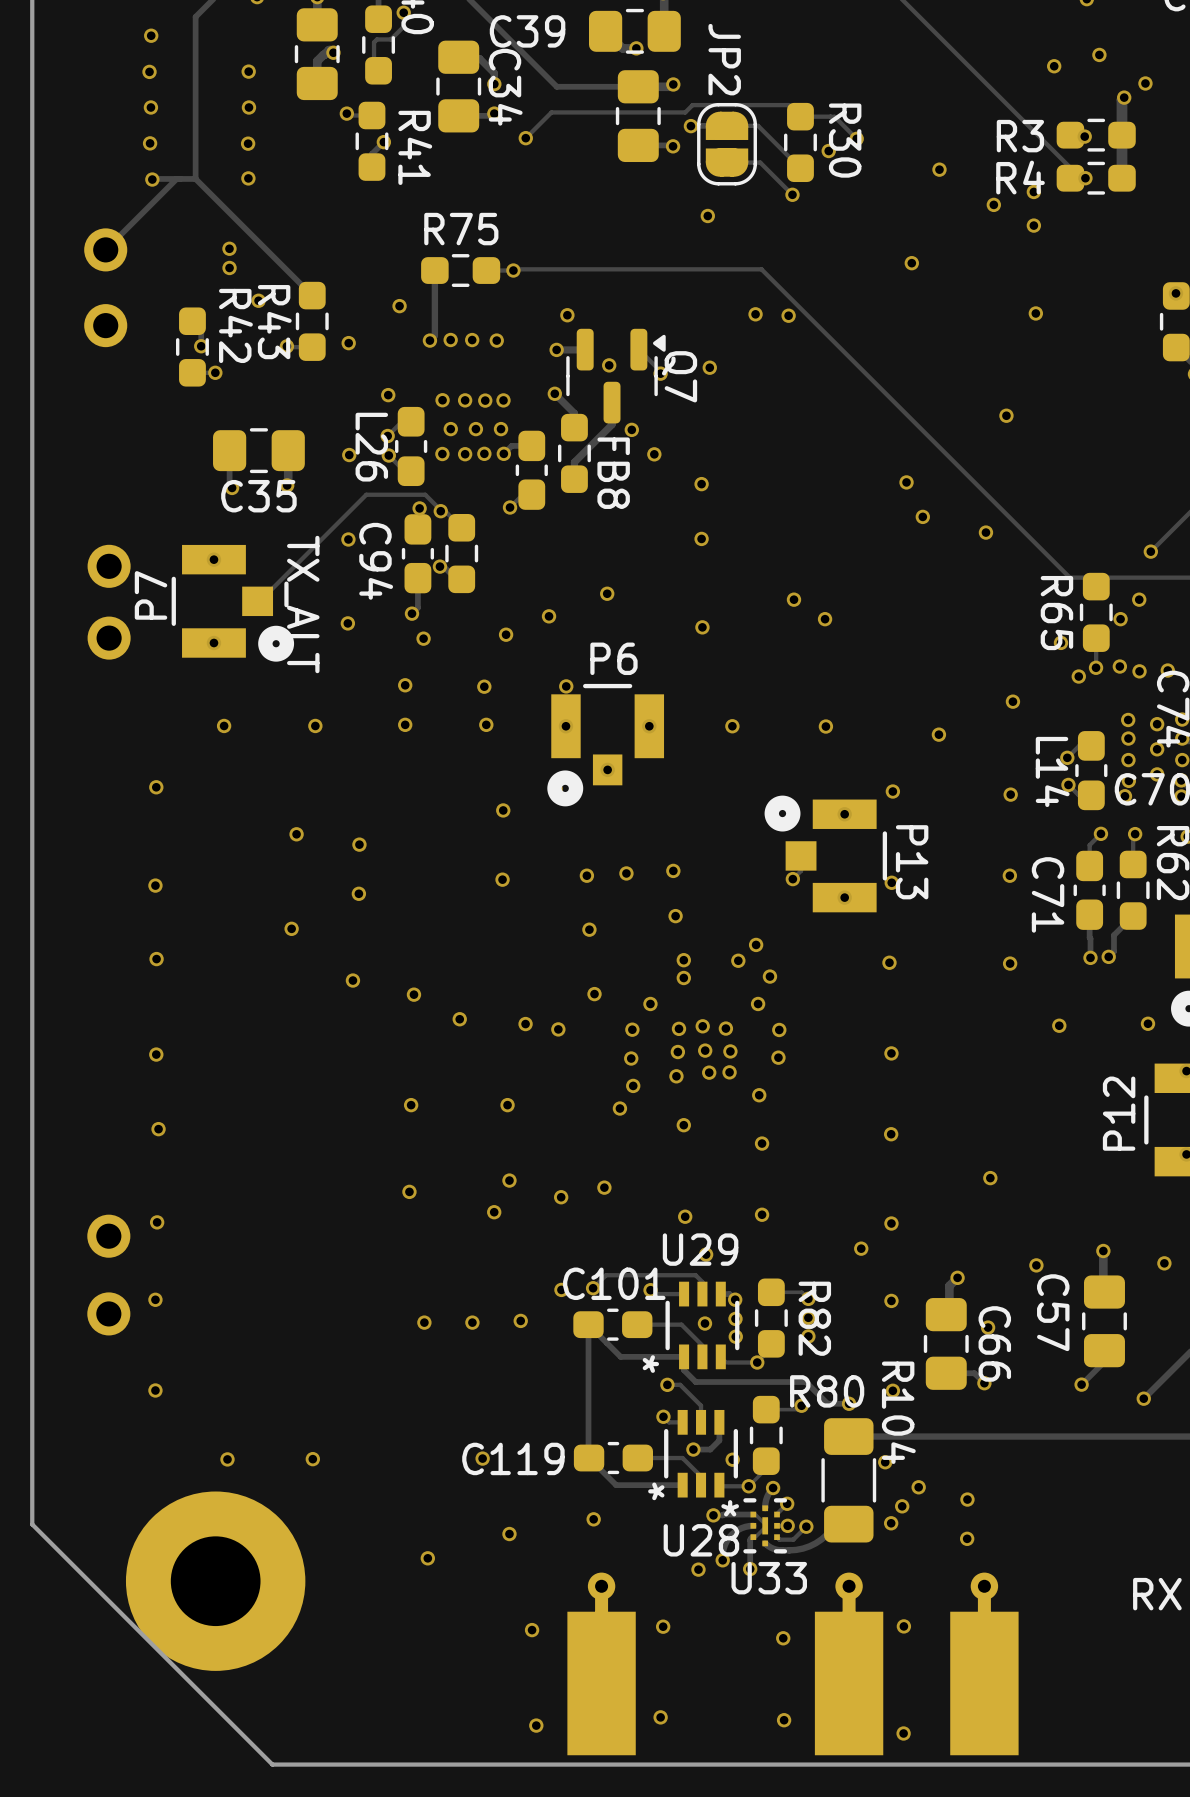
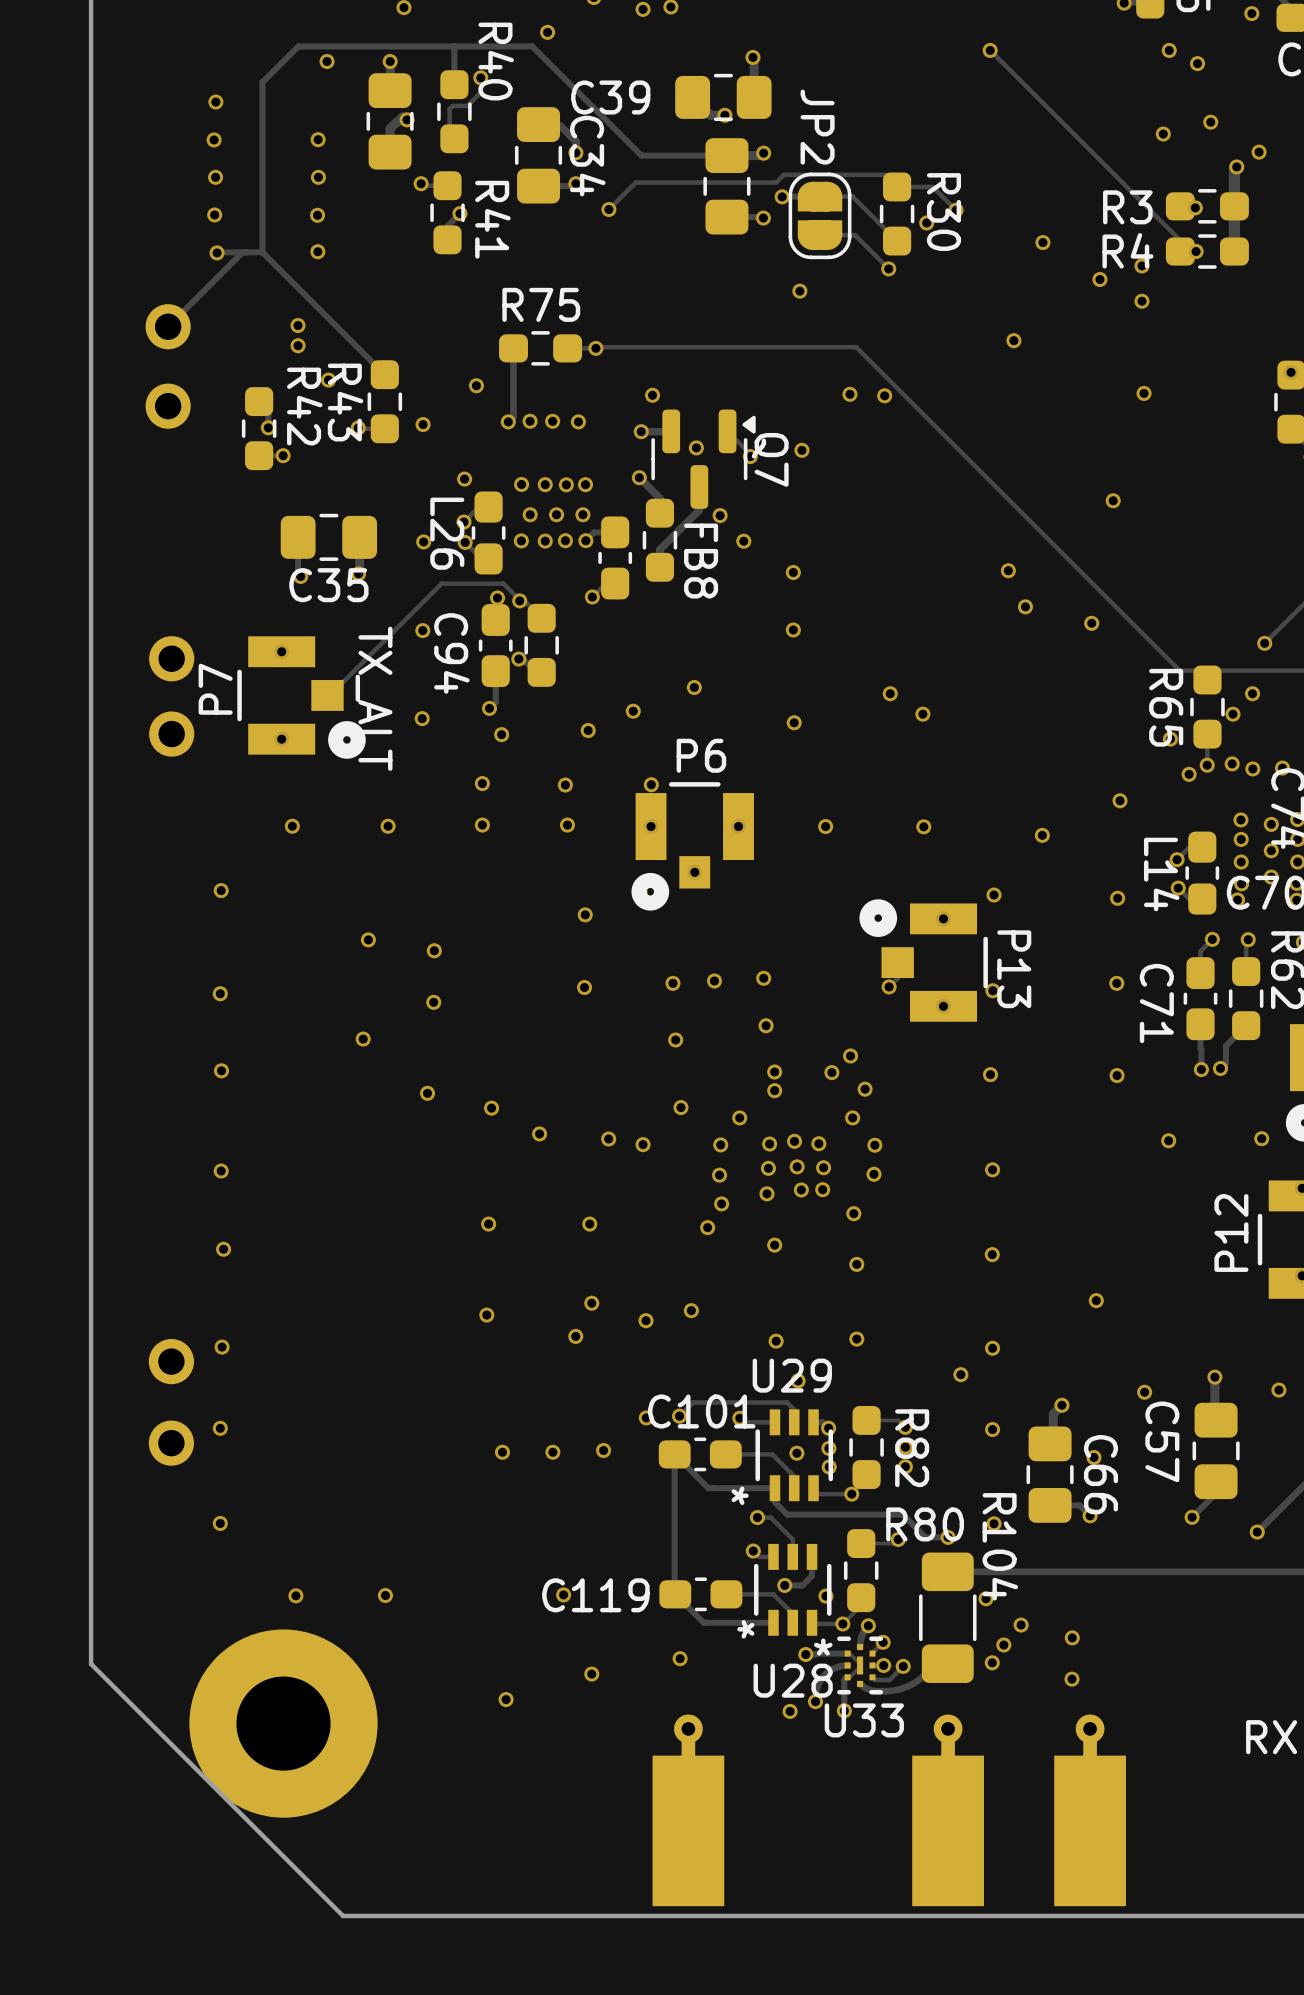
via: (663, 1626) -> none
via: (903, 1626) -> none
via: (532, 1630) -> none
via: (783, 1638) -> none
via: (660, 1717) -> none
via: (784, 1720) -> none
via: (536, 1725) -> none
via: (903, 1733) -> none

